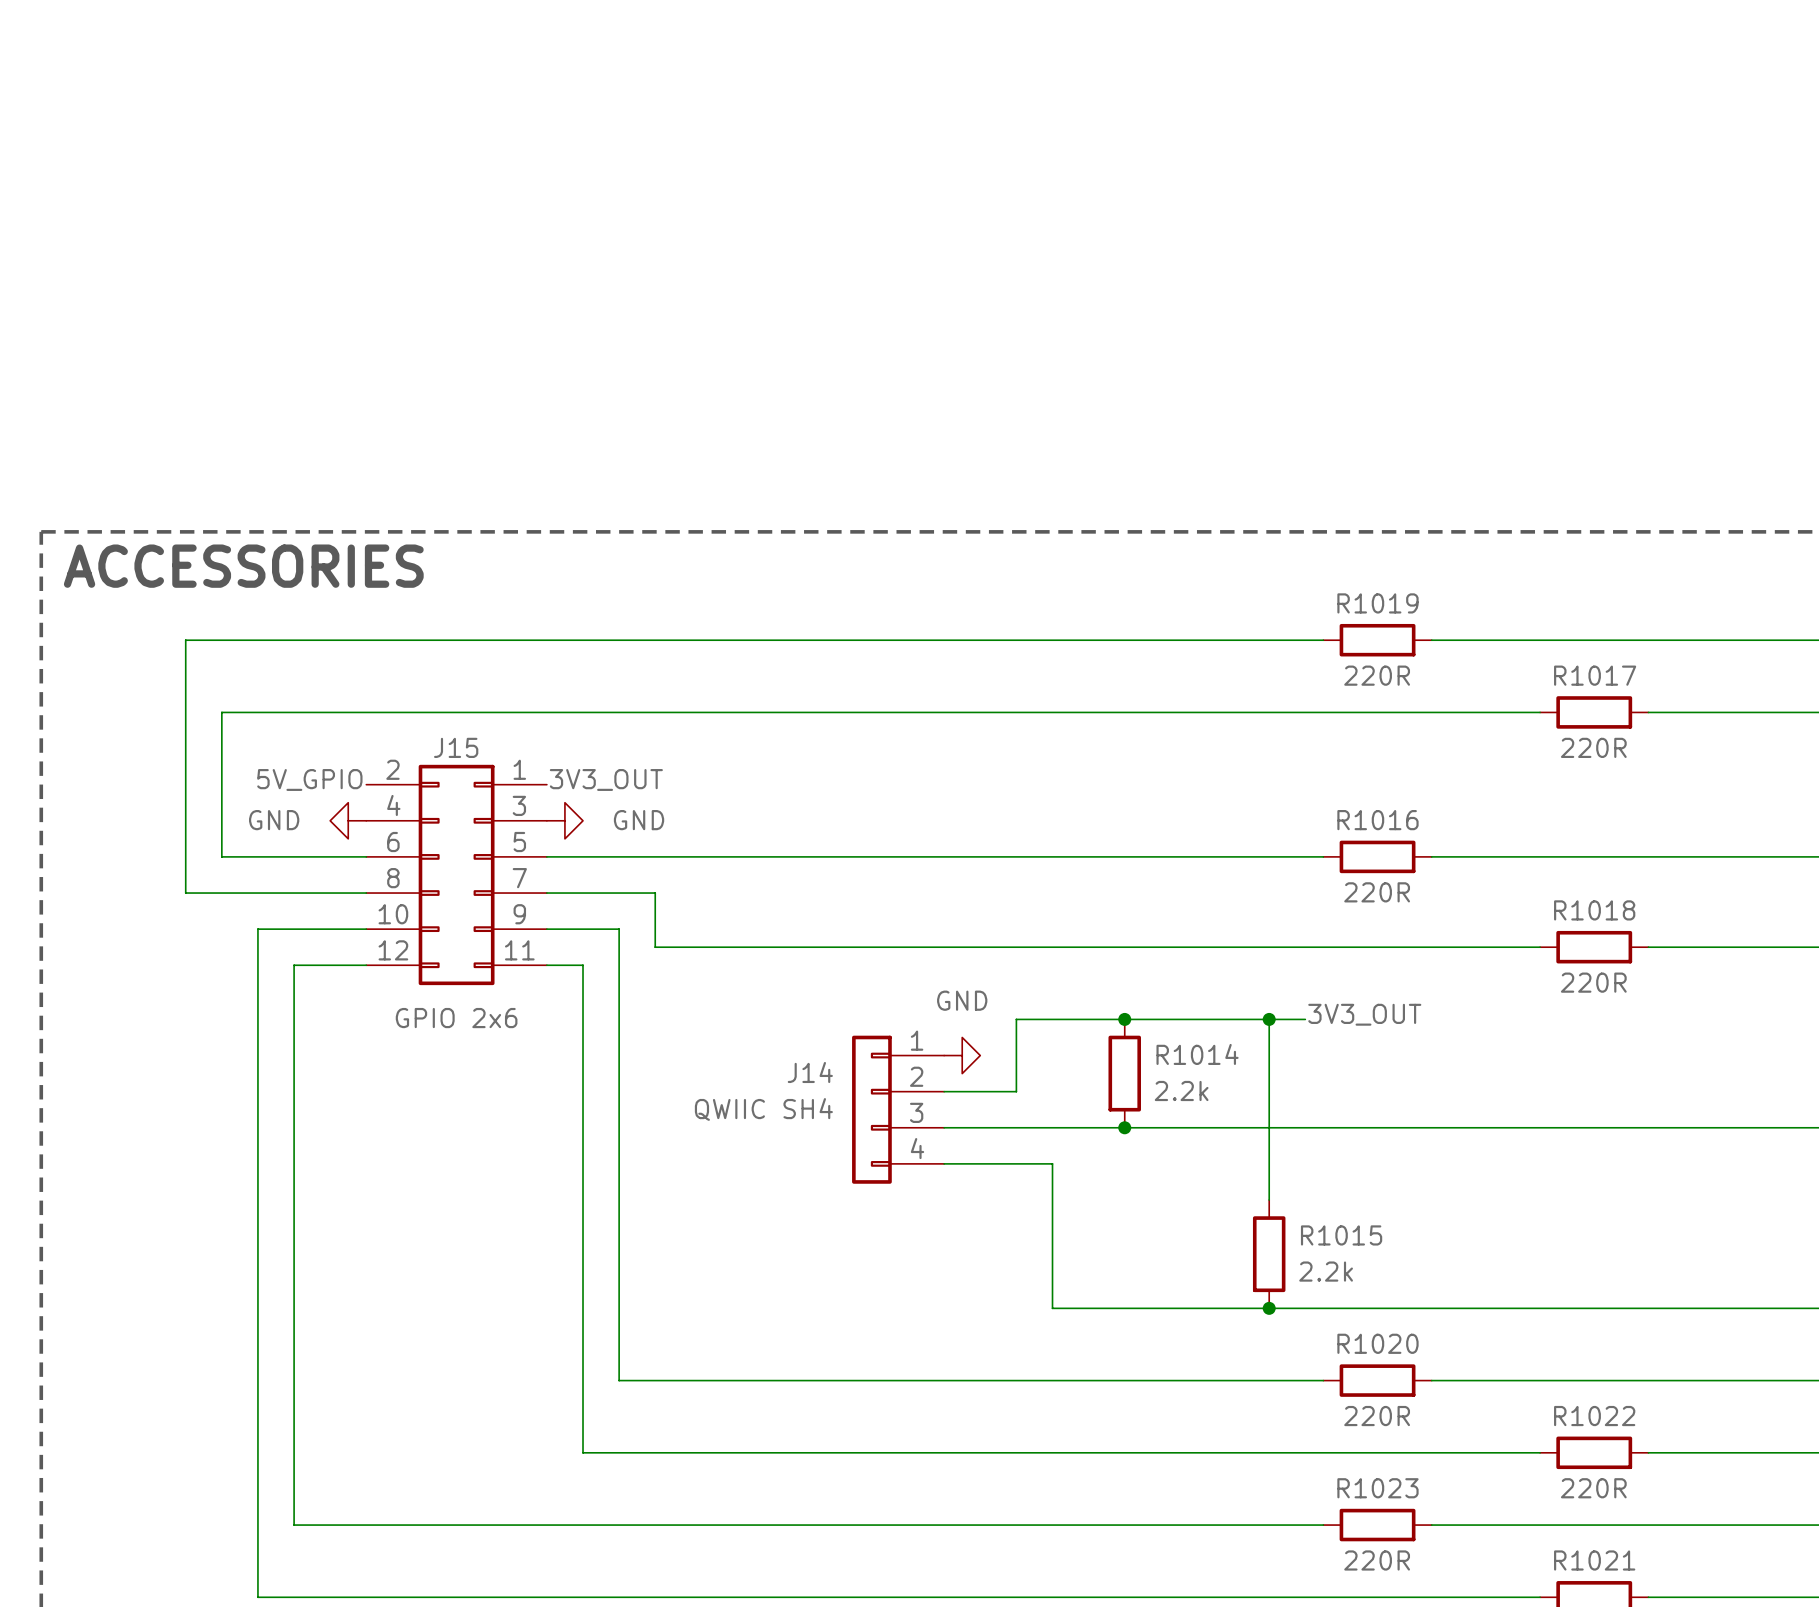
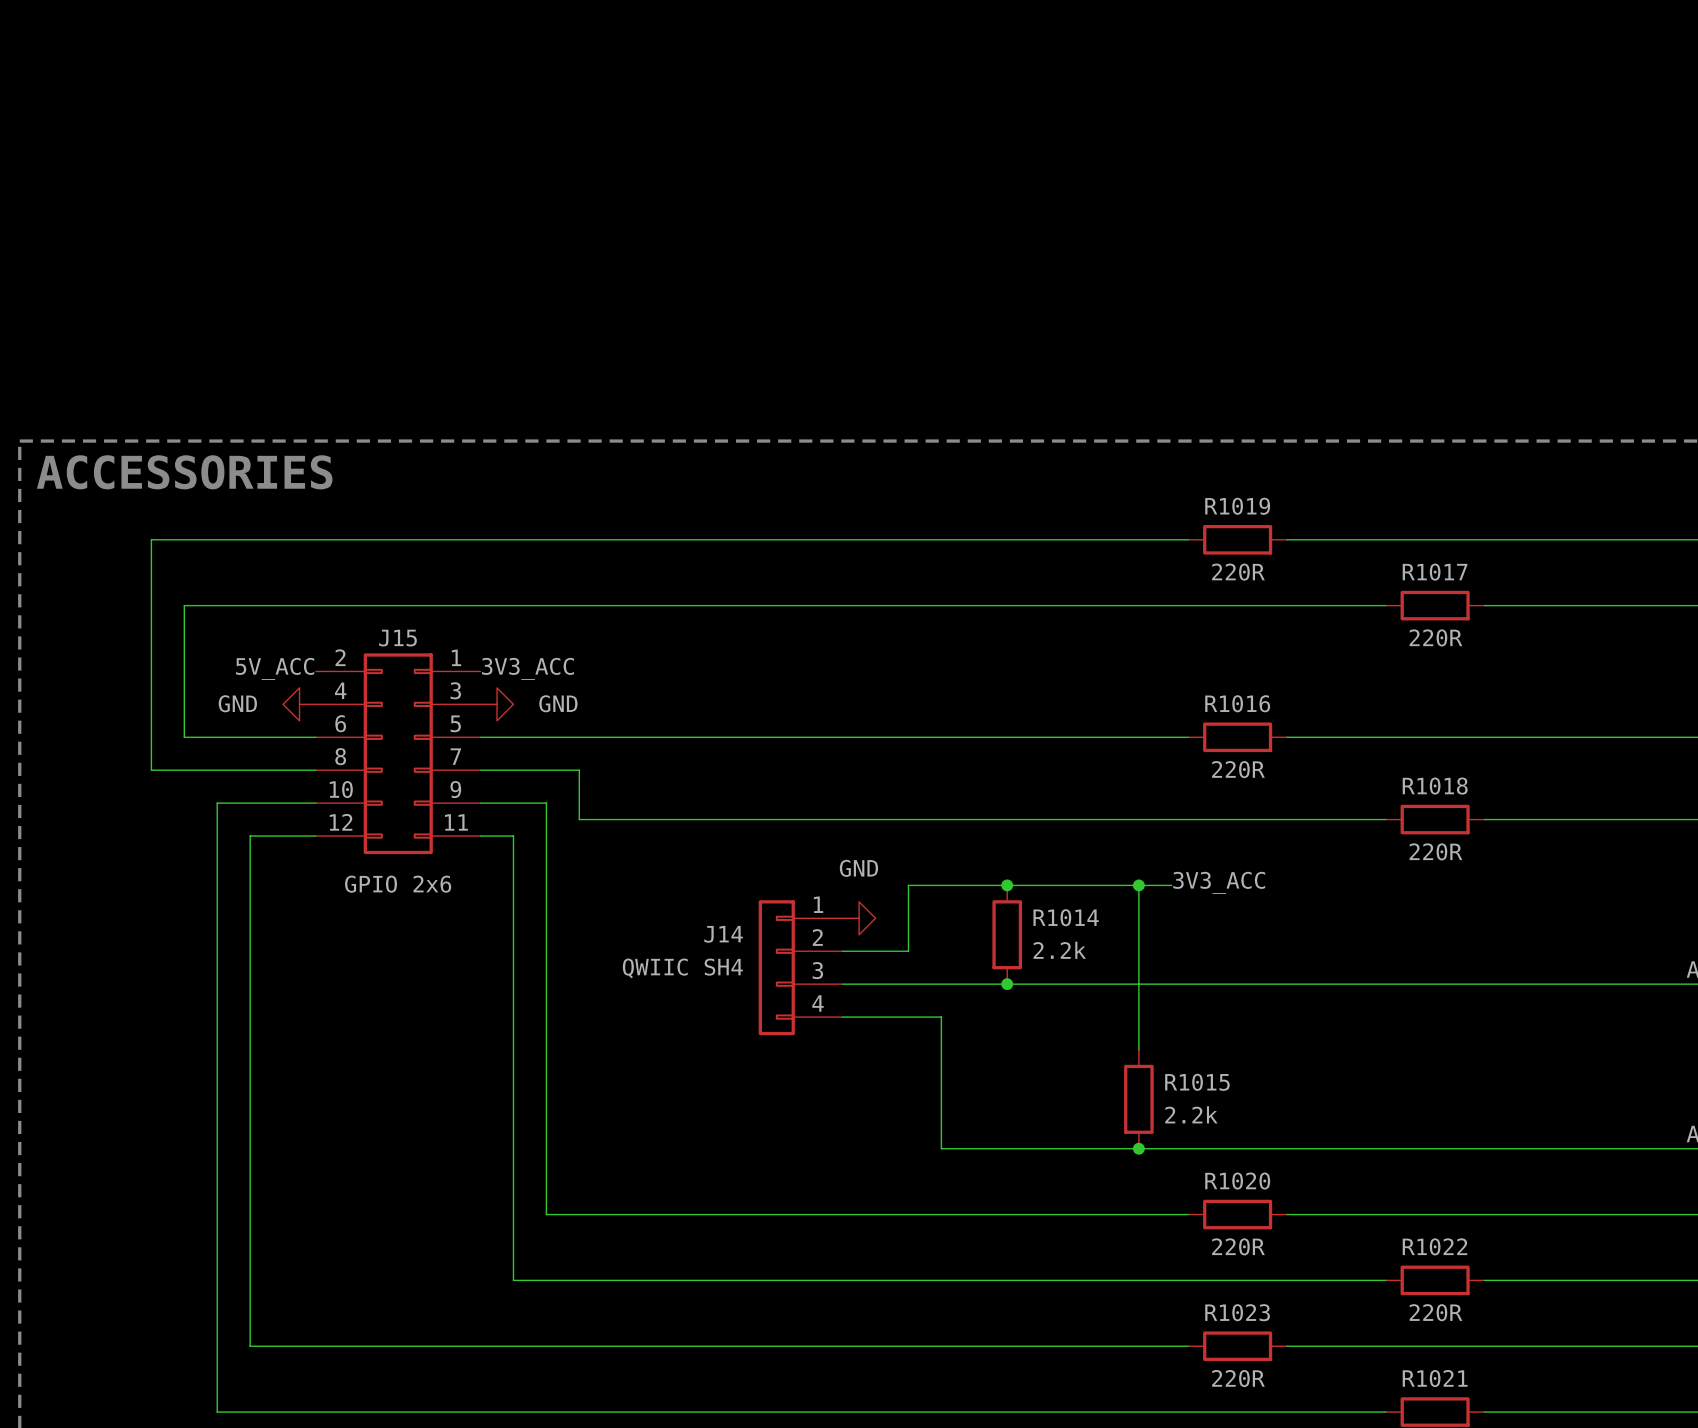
label: 5V_GPIO (309, 779) -> 5V_ACC (275, 668)
label: 3V3_OUT (606, 779) -> 3V3_ACC (528, 668)
label: 3V3_OUT (1364, 1014) -> 3V3_ACC (1219, 882)

